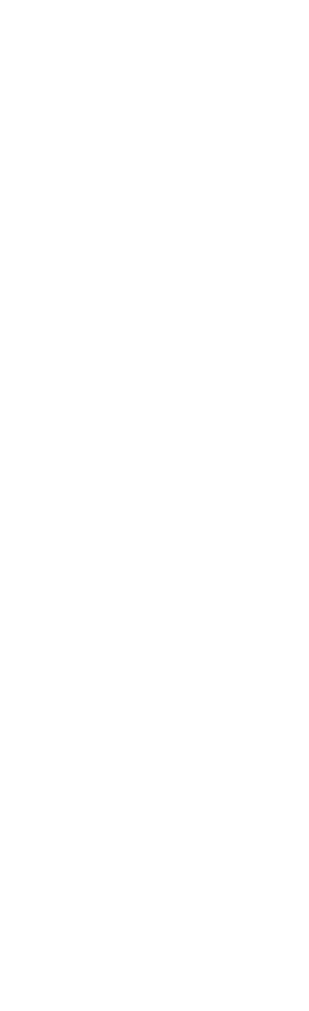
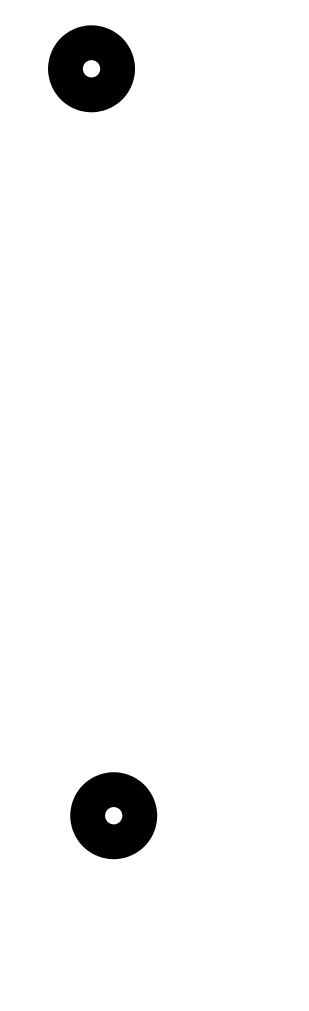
part: none -> (91, 68)
part: none -> (113, 815)

